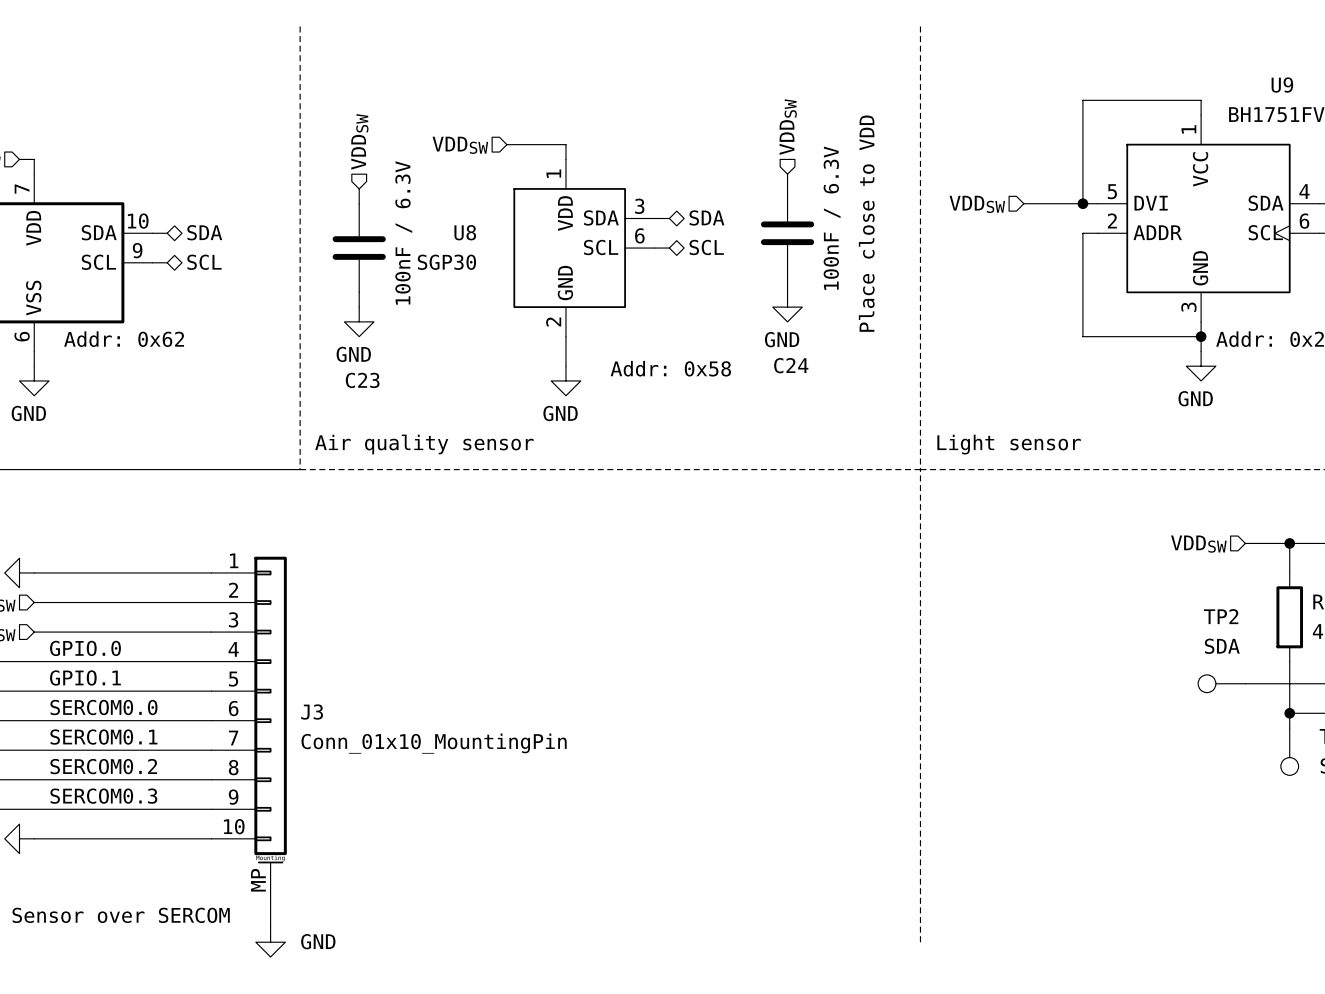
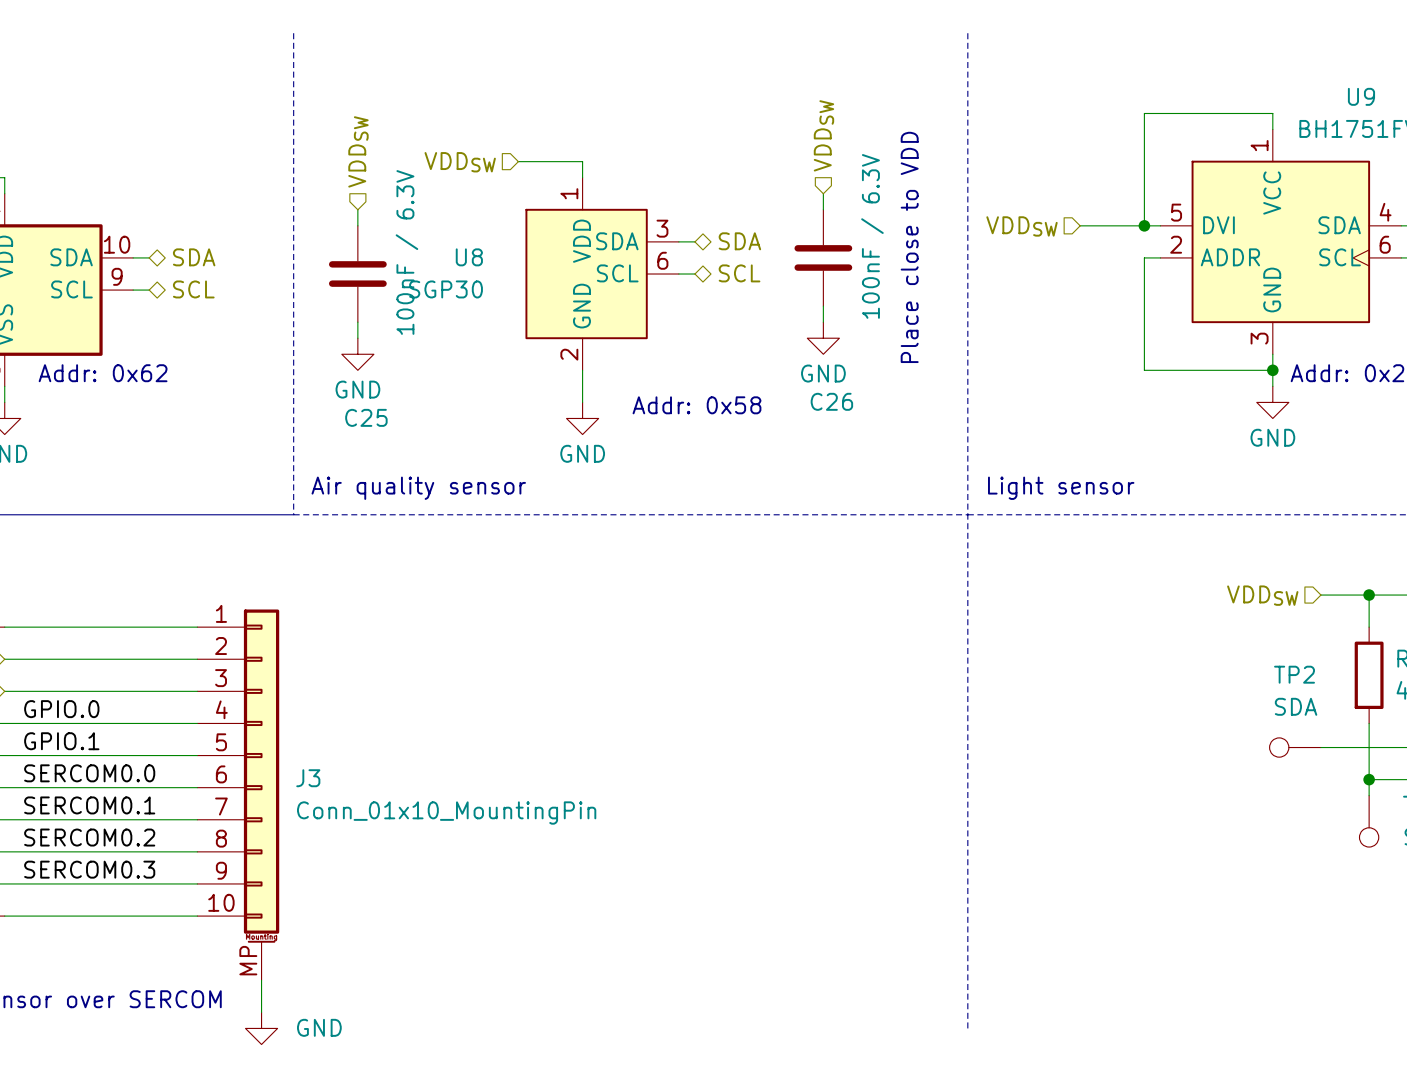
C24 name: C24 (791, 365) -> C26 (831, 401)
C23 name: C23 (362, 380) -> C25 (366, 417)

